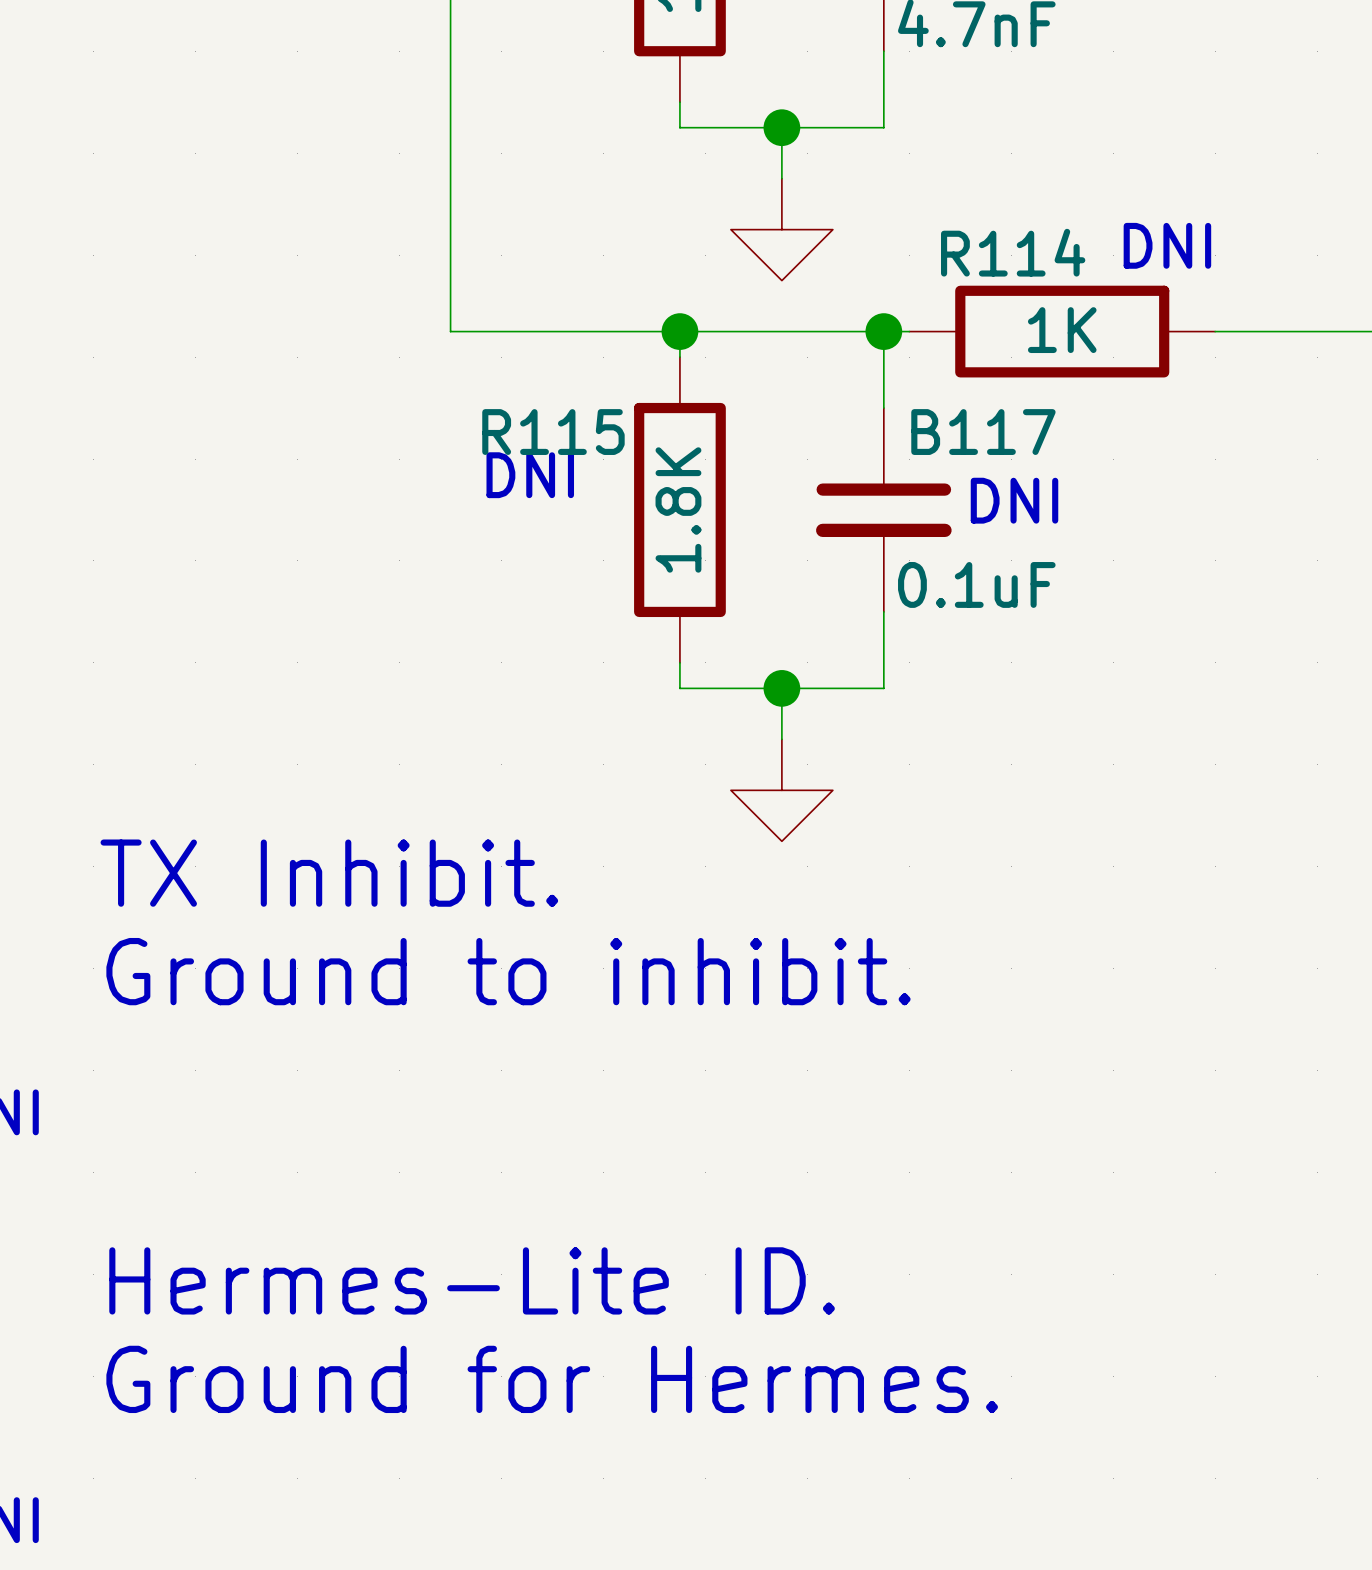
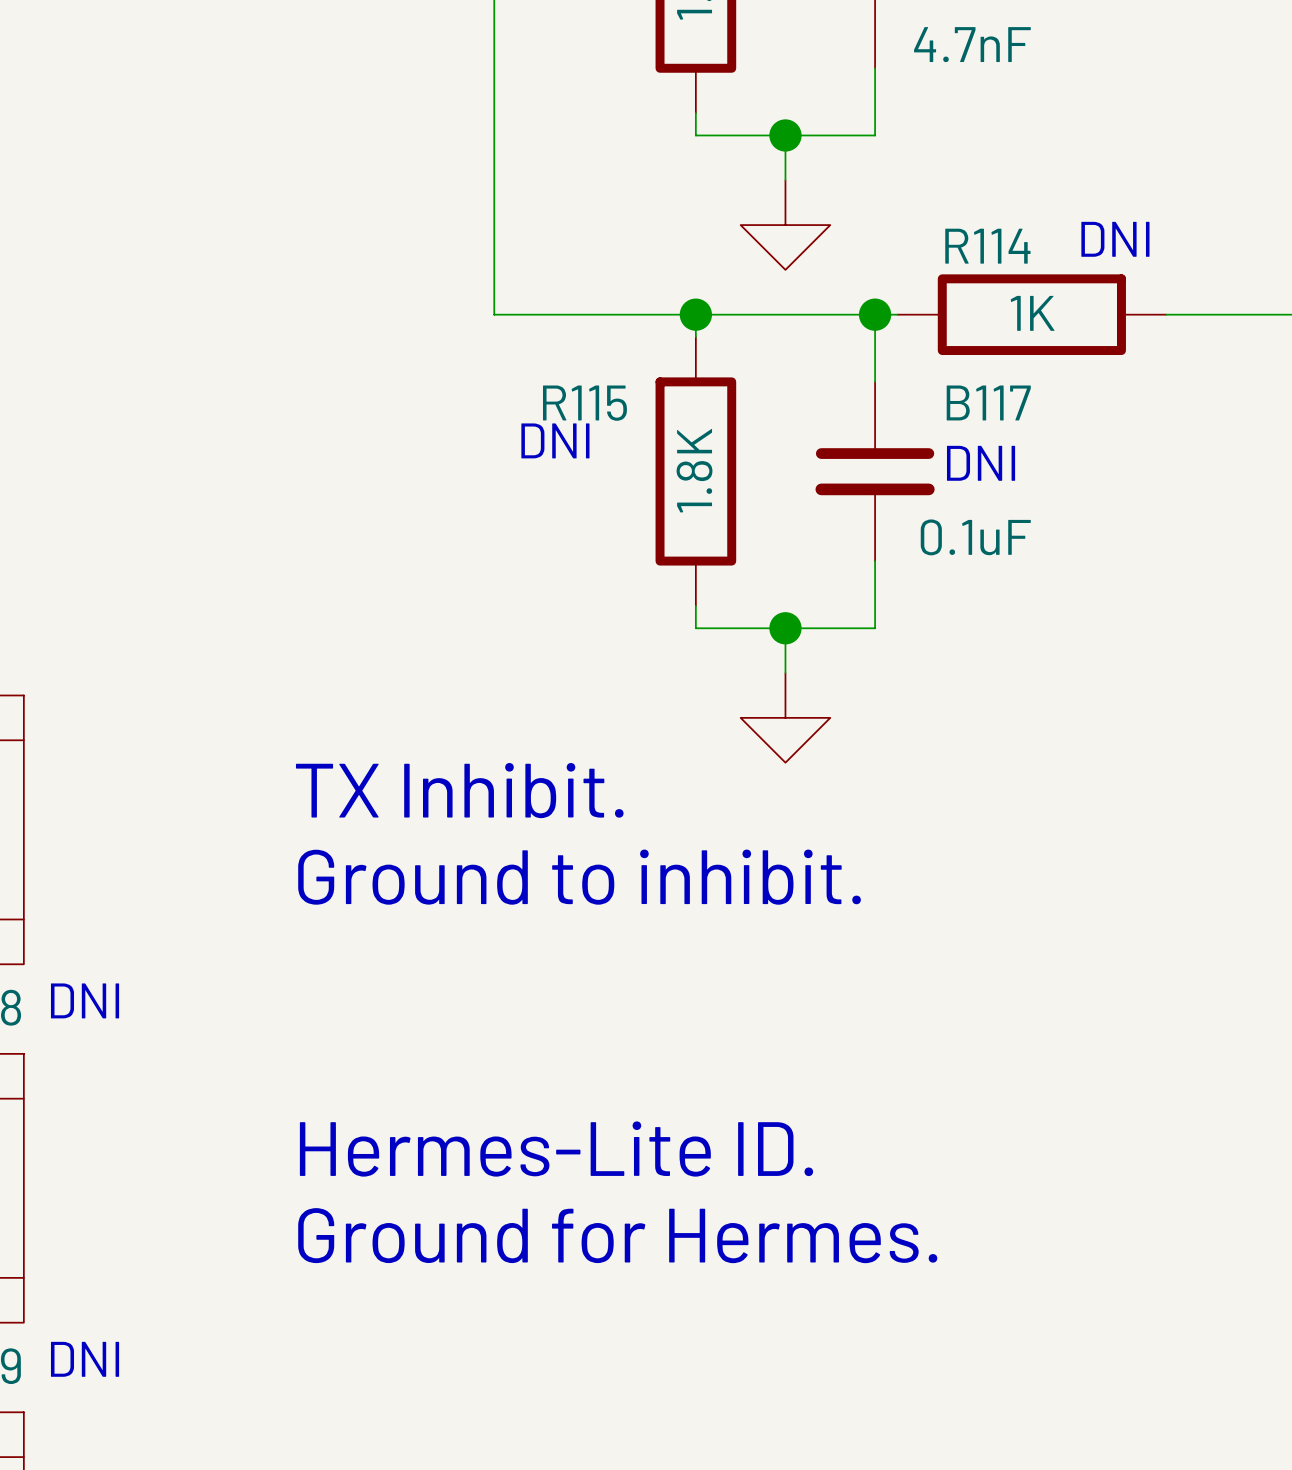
text position: TX Inhibit. (329, 873) -> TX Inhibit. (459, 790)
text position: Ground to inhibit. (508, 971) -> Ground to inhibit. (579, 877)
text position: Hermes-Lite ID. (472, 1280) -> Hermes-Lite ID. (556, 1149)
text position: Ground for Hermes. (552, 1379) -> Ground for Hermes. (617, 1235)

